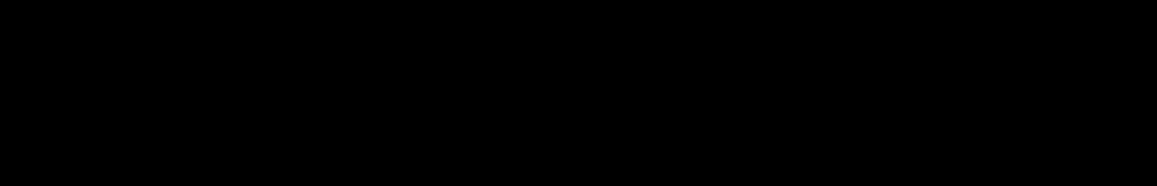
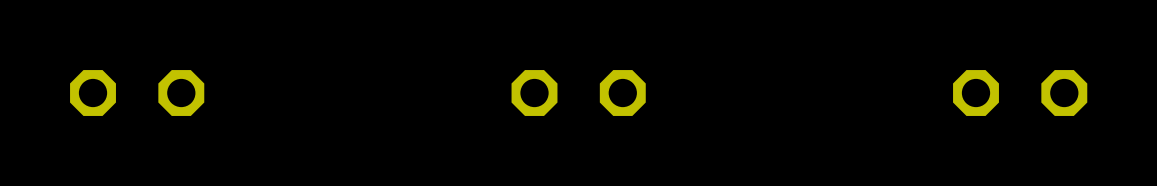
part: none -> (137, 93)
part: none -> (578, 93)
part: none -> (1020, 93)

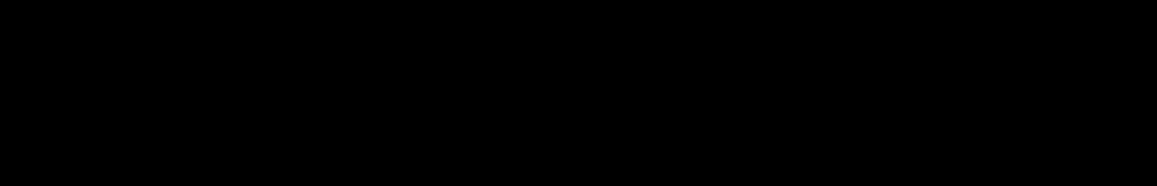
part: (137, 93) -> none
part: (578, 93) -> none
part: (1020, 93) -> none

